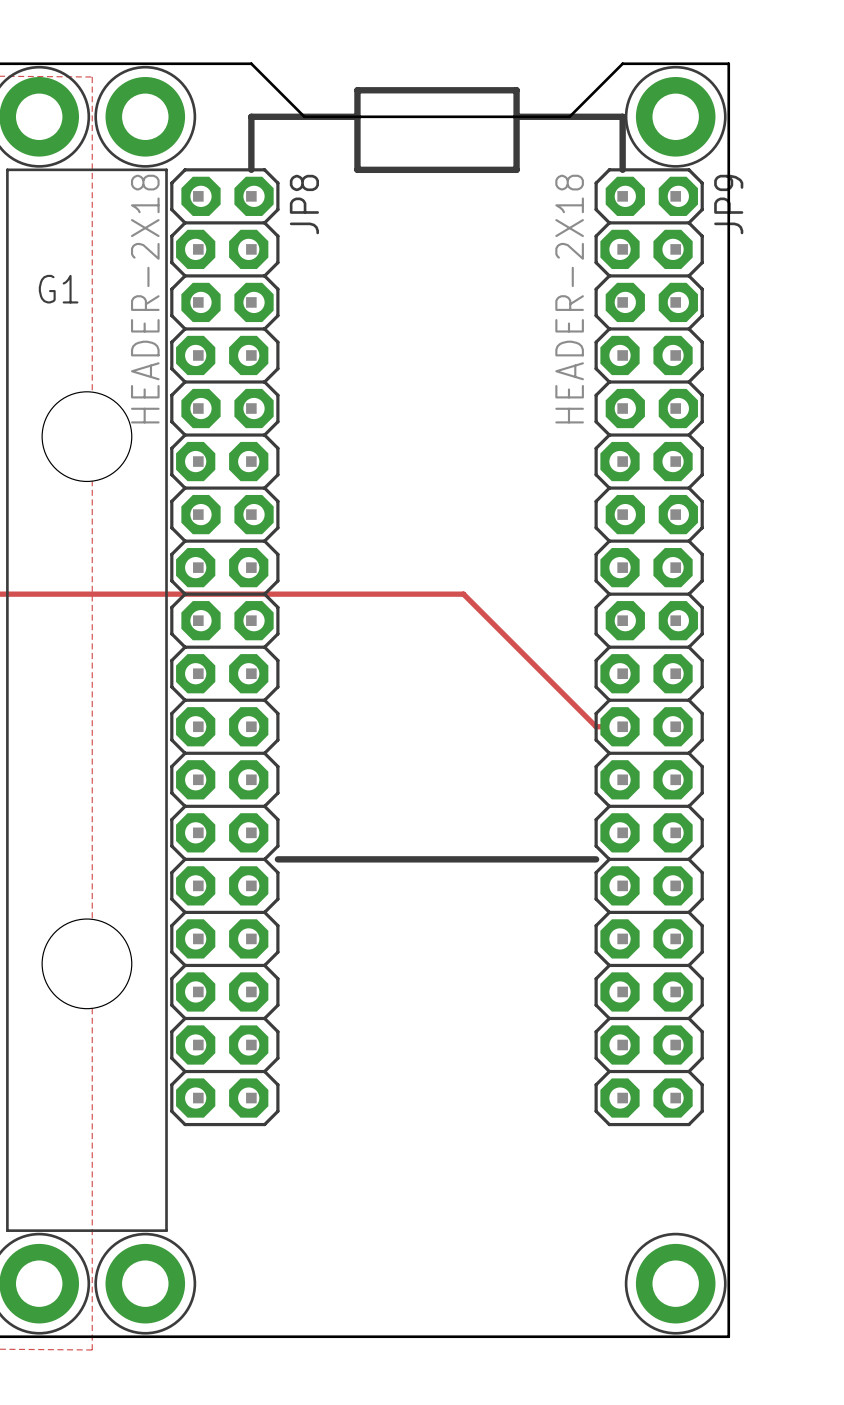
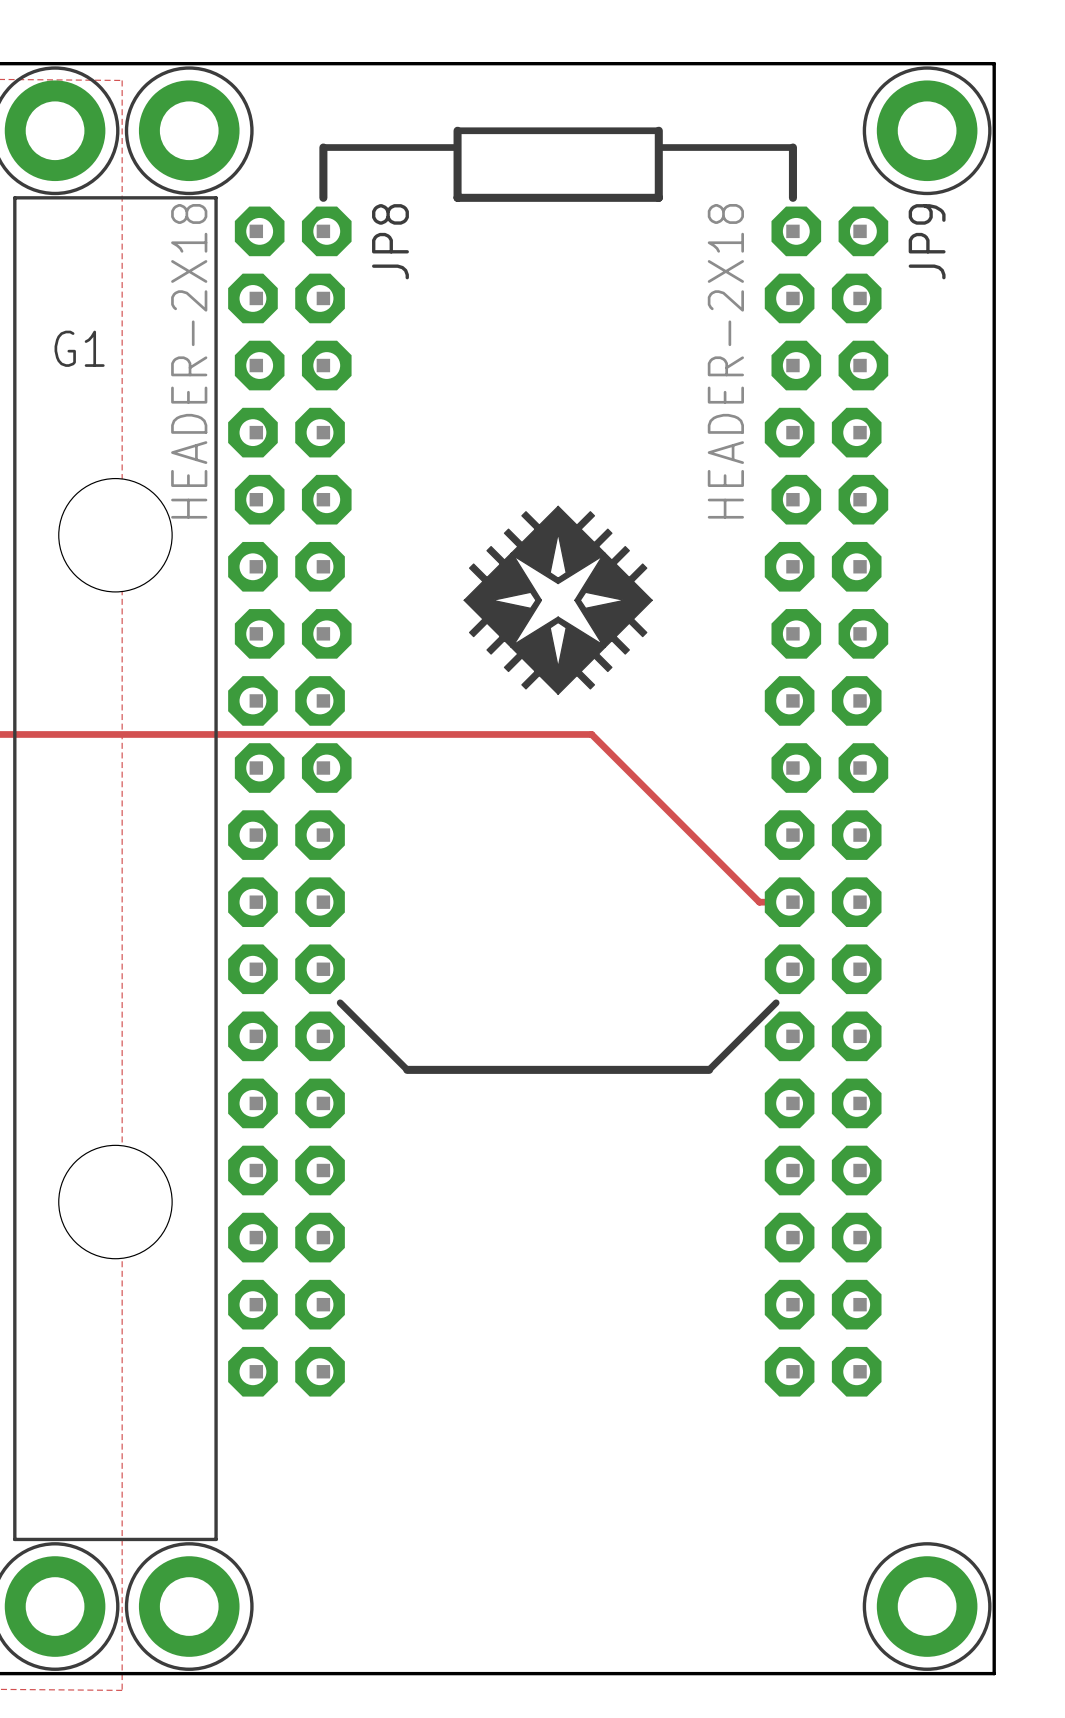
board edge: (251, 63) (304, 116) (569, 116) (622, 63) -> (323, 63) (792, 63)
board edge: (728, 63) (728, 1336) -> (927, 63) (994, 63) (994, 1673) (927, 1673)
line: none -> (457, 130) (658, 130)
part position: (675, 116) -> (927, 130)
line: (251, 130) (251, 116) (357, 116) (357, 90) (516, 90) (516, 116) (622, 116) (622, 130) -> (323, 147) (457, 147)
line: none -> (658, 147) (792, 147)
JP8 footprint: [170, 168, 280, 1127] -> [228, 206, 352, 1397]
JP9 footprint: [594, 168, 704, 1127] -> [764, 206, 889, 1397]
drawing: none -> [463, 505, 653, 695]
line: (277, 859) (317, 859) -> (340, 1002) (407, 1069)
line: (556, 859) (596, 859) -> (709, 1069) (776, 1002)
part position: (675, 1283) -> (927, 1606)

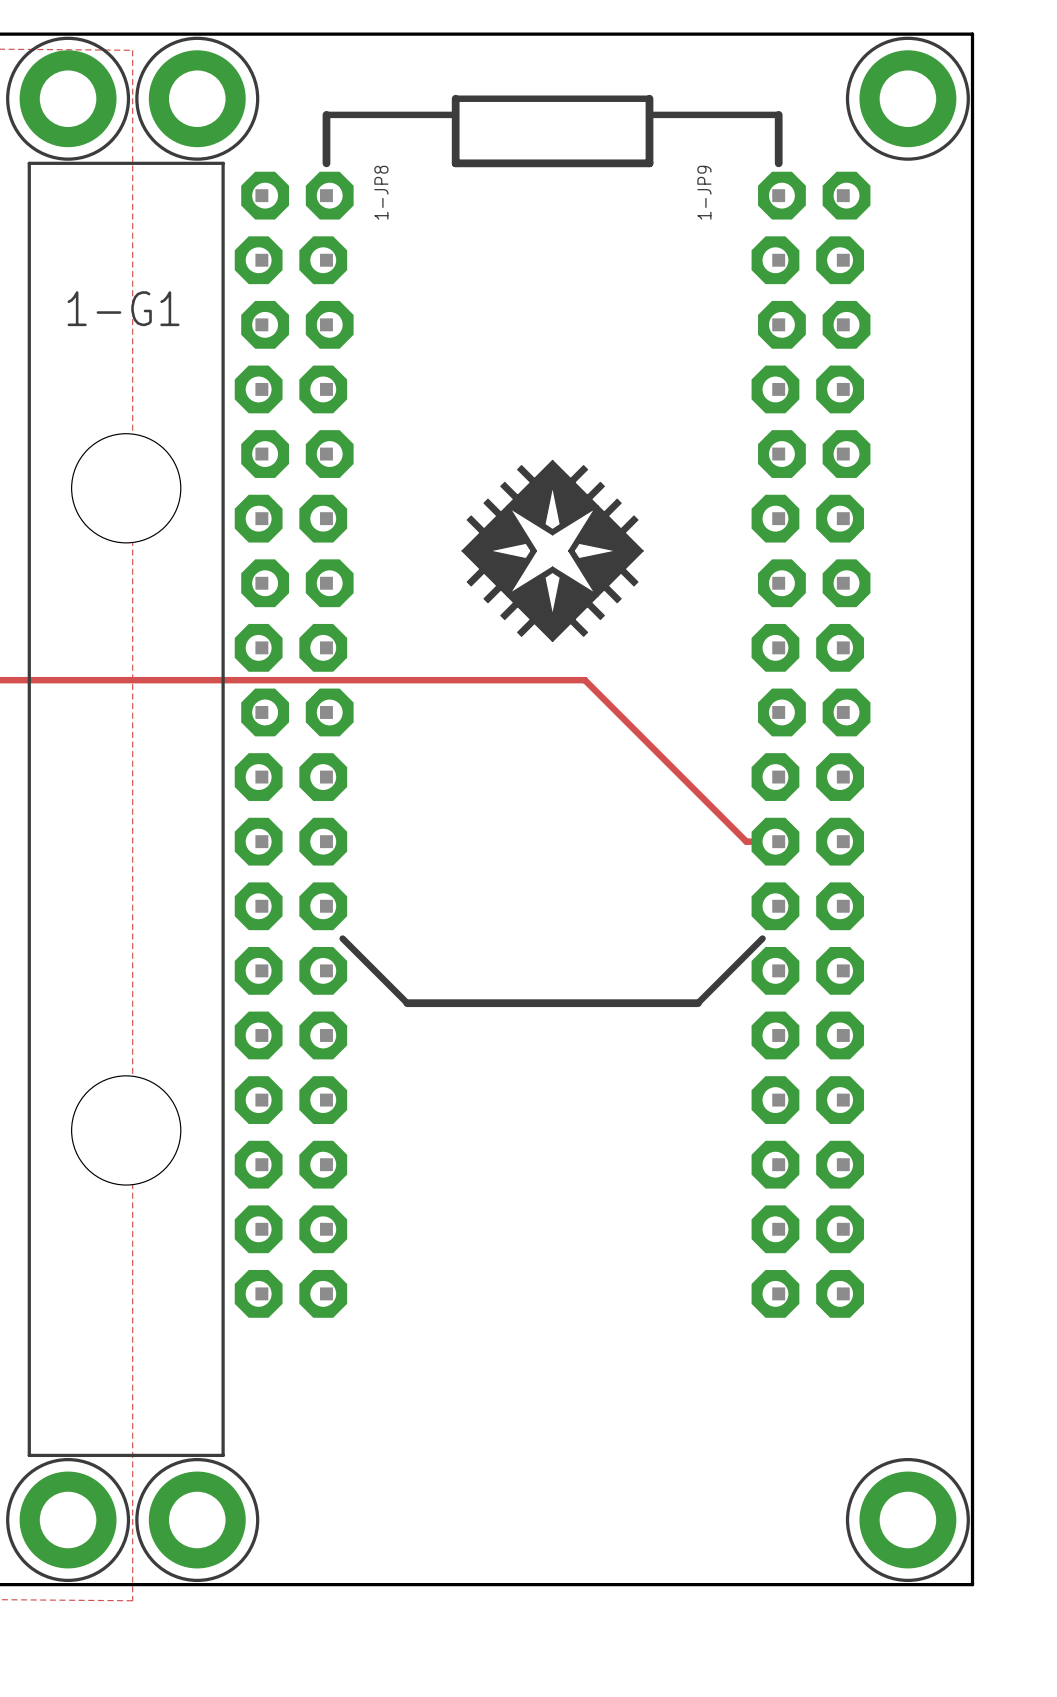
JP8 name: JP8 (390, 241) -> 1-JP8 (381, 192)
JP9 name: JP9 (927, 241) -> 1-JP9 (704, 192)
G1 name: G1 (79, 348) -> 1-G1 (123, 308)
JP8 value: HEADER-2X18 (189, 361) -> none
JP9 value: HEADER-2X18 (725, 361) -> none

